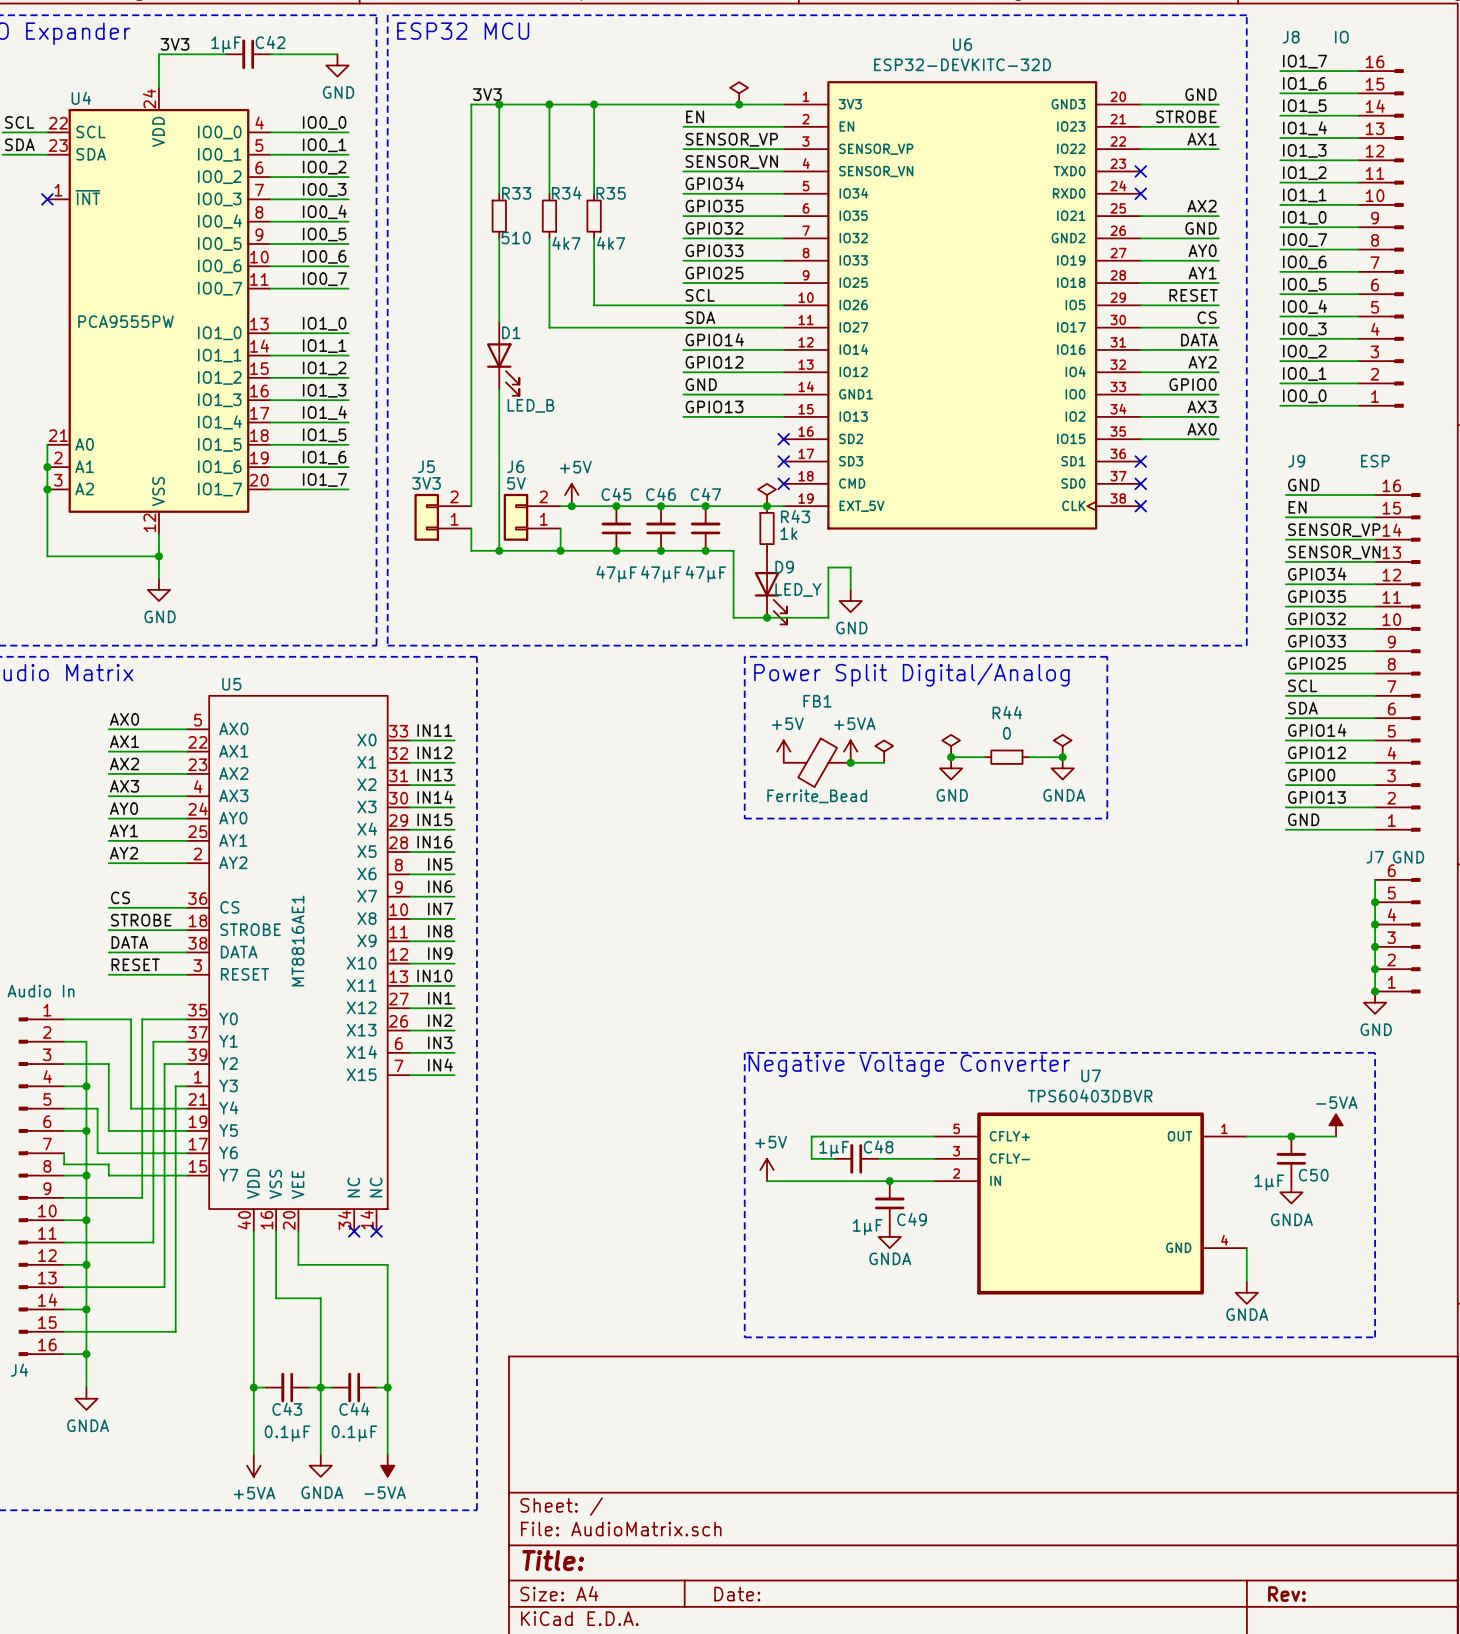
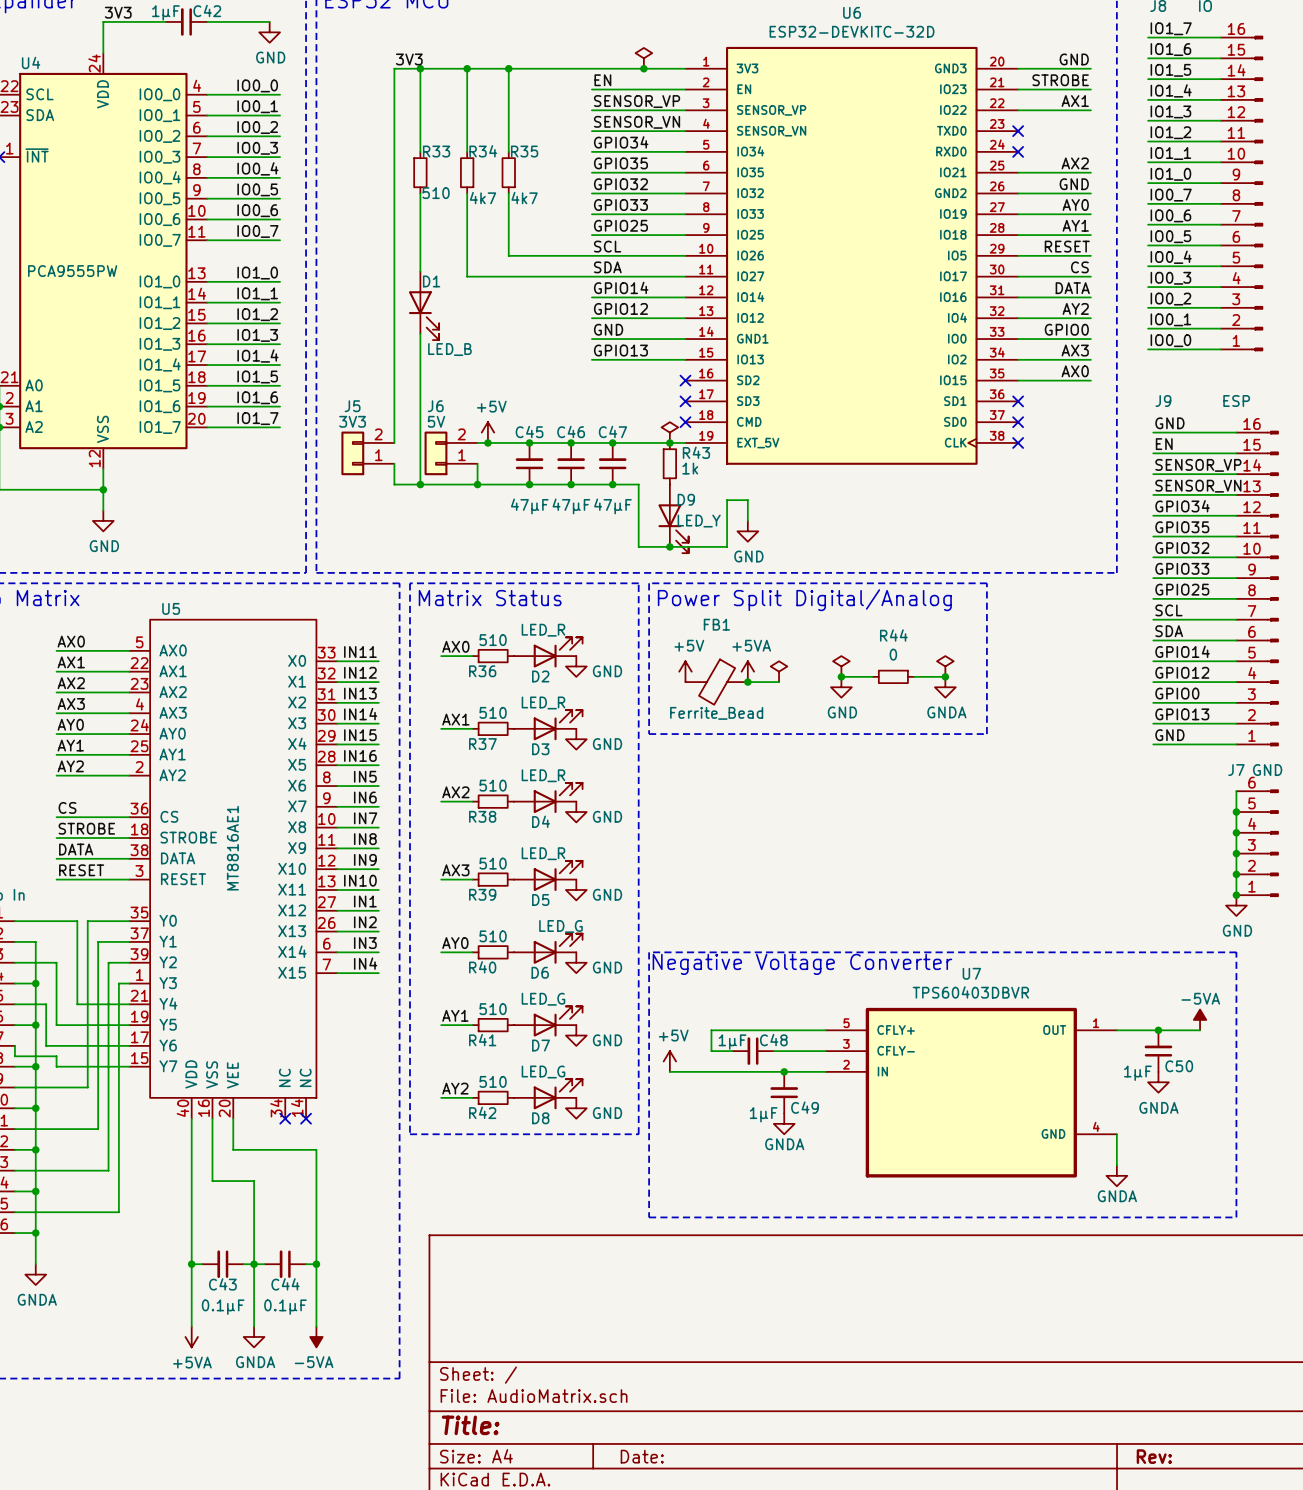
line: none -> (409, 583) (638, 583) (638, 1134) (409, 1134) (409, 583)
text: none -> Matrix Status (490, 598)
label: none -> AX0 (455, 646)
D2: none -> LED_R (548, 652)
wire: none -> (441, 656) (472, 656)
R36: none -> 510 (493, 656)
power symbol: none -> GND (576, 666)
label: none -> AX1 (455, 719)
D3: none -> LED_R (548, 725)
wire: none -> (441, 728) (472, 728)
R37: none -> 510 (493, 728)
power symbol: none -> GND (576, 739)
label: none -> AX2 (455, 792)
D4: none -> LED_R (548, 797)
wire: none -> (441, 801) (472, 801)
R38: none -> 510 (493, 801)
power symbol: none -> GND (576, 812)
label: none -> AX3 (455, 870)
D5: none -> LED_R (548, 875)
wire: none -> (441, 879) (472, 879)
R39: none -> 510 (493, 879)
power symbol: none -> GND (576, 889)
label: none -> AY0 (455, 943)
D6: none -> LED_G (548, 948)
wire: none -> (441, 952) (472, 952)
R40: none -> 510 (493, 952)
power symbol: none -> GND (576, 962)
label: none -> AY1 (455, 1015)
D7: none -> LED_G (548, 1021)
wire: none -> (441, 1025) (472, 1025)
R41: none -> 510 (493, 1025)
power symbol: none -> GND (576, 1035)
label: none -> AY2 (455, 1088)
D8: none -> LED_G (548, 1094)
wire: none -> (441, 1097) (472, 1097)
R42: none -> 510 (493, 1097)
power symbol: none -> GND (576, 1108)

